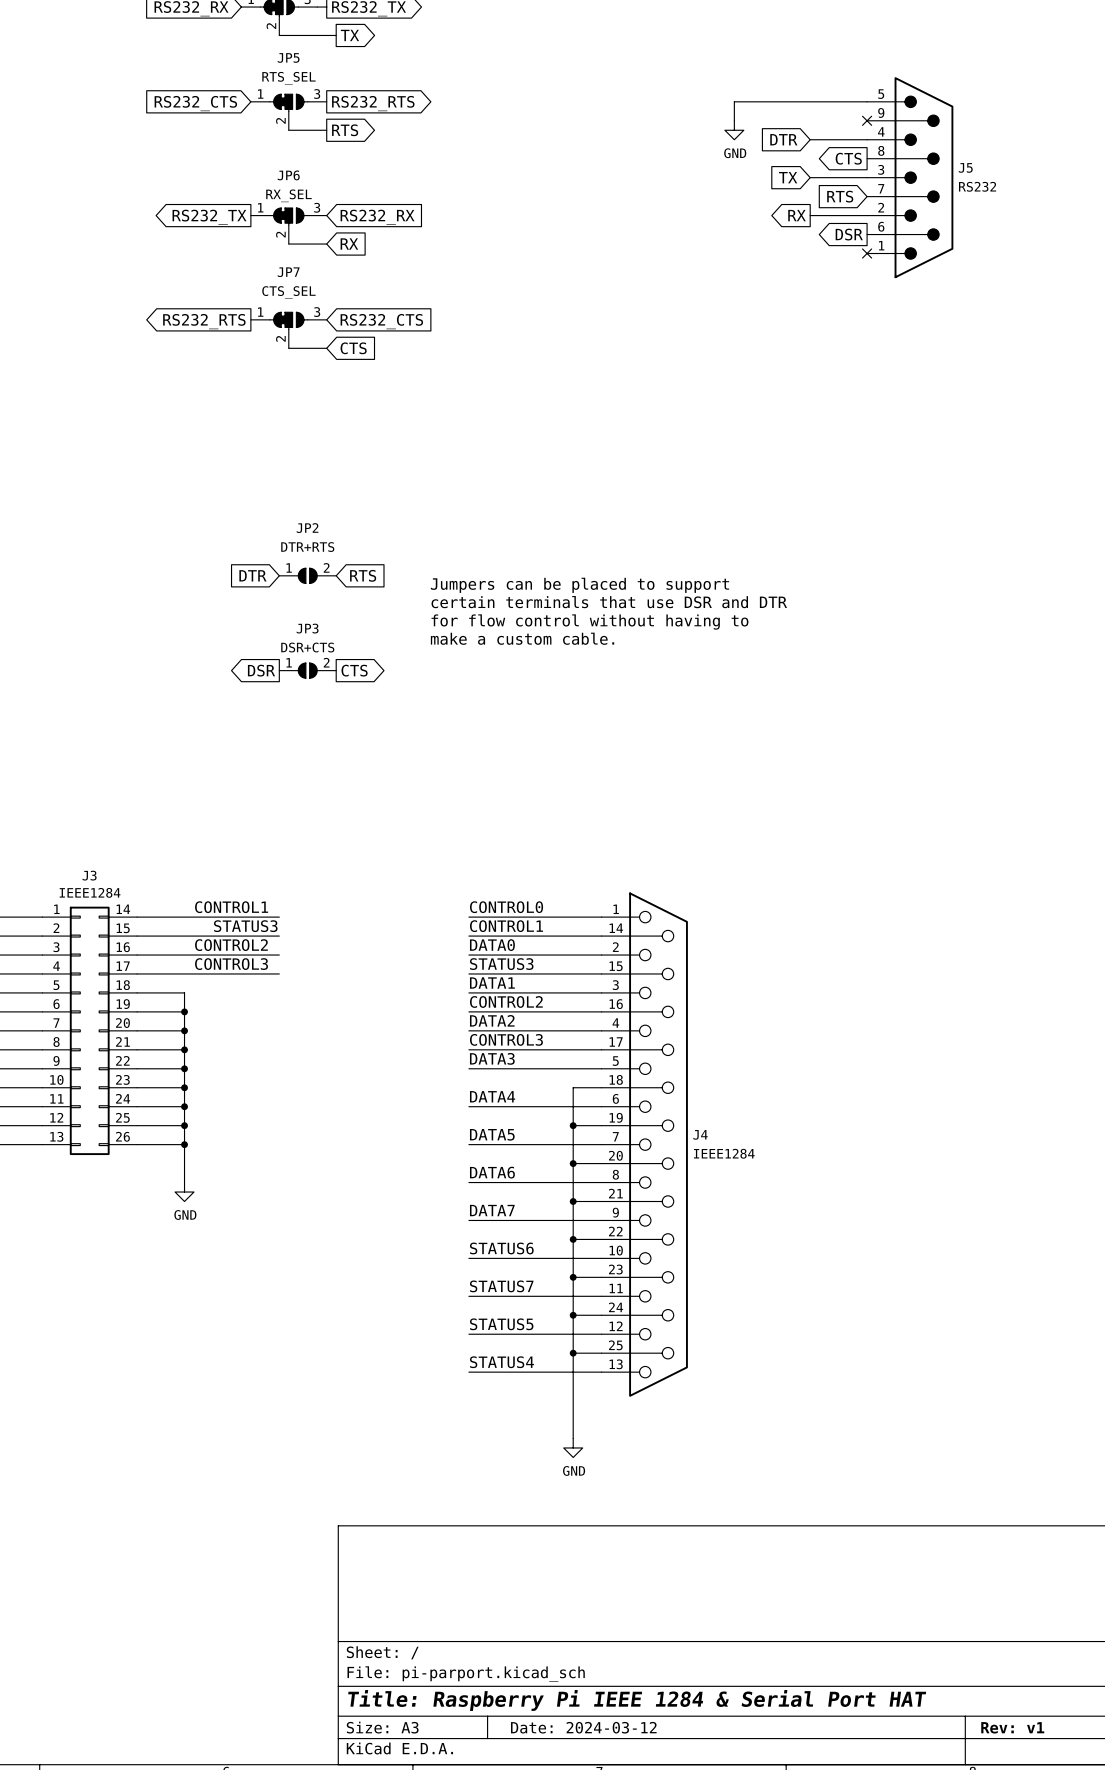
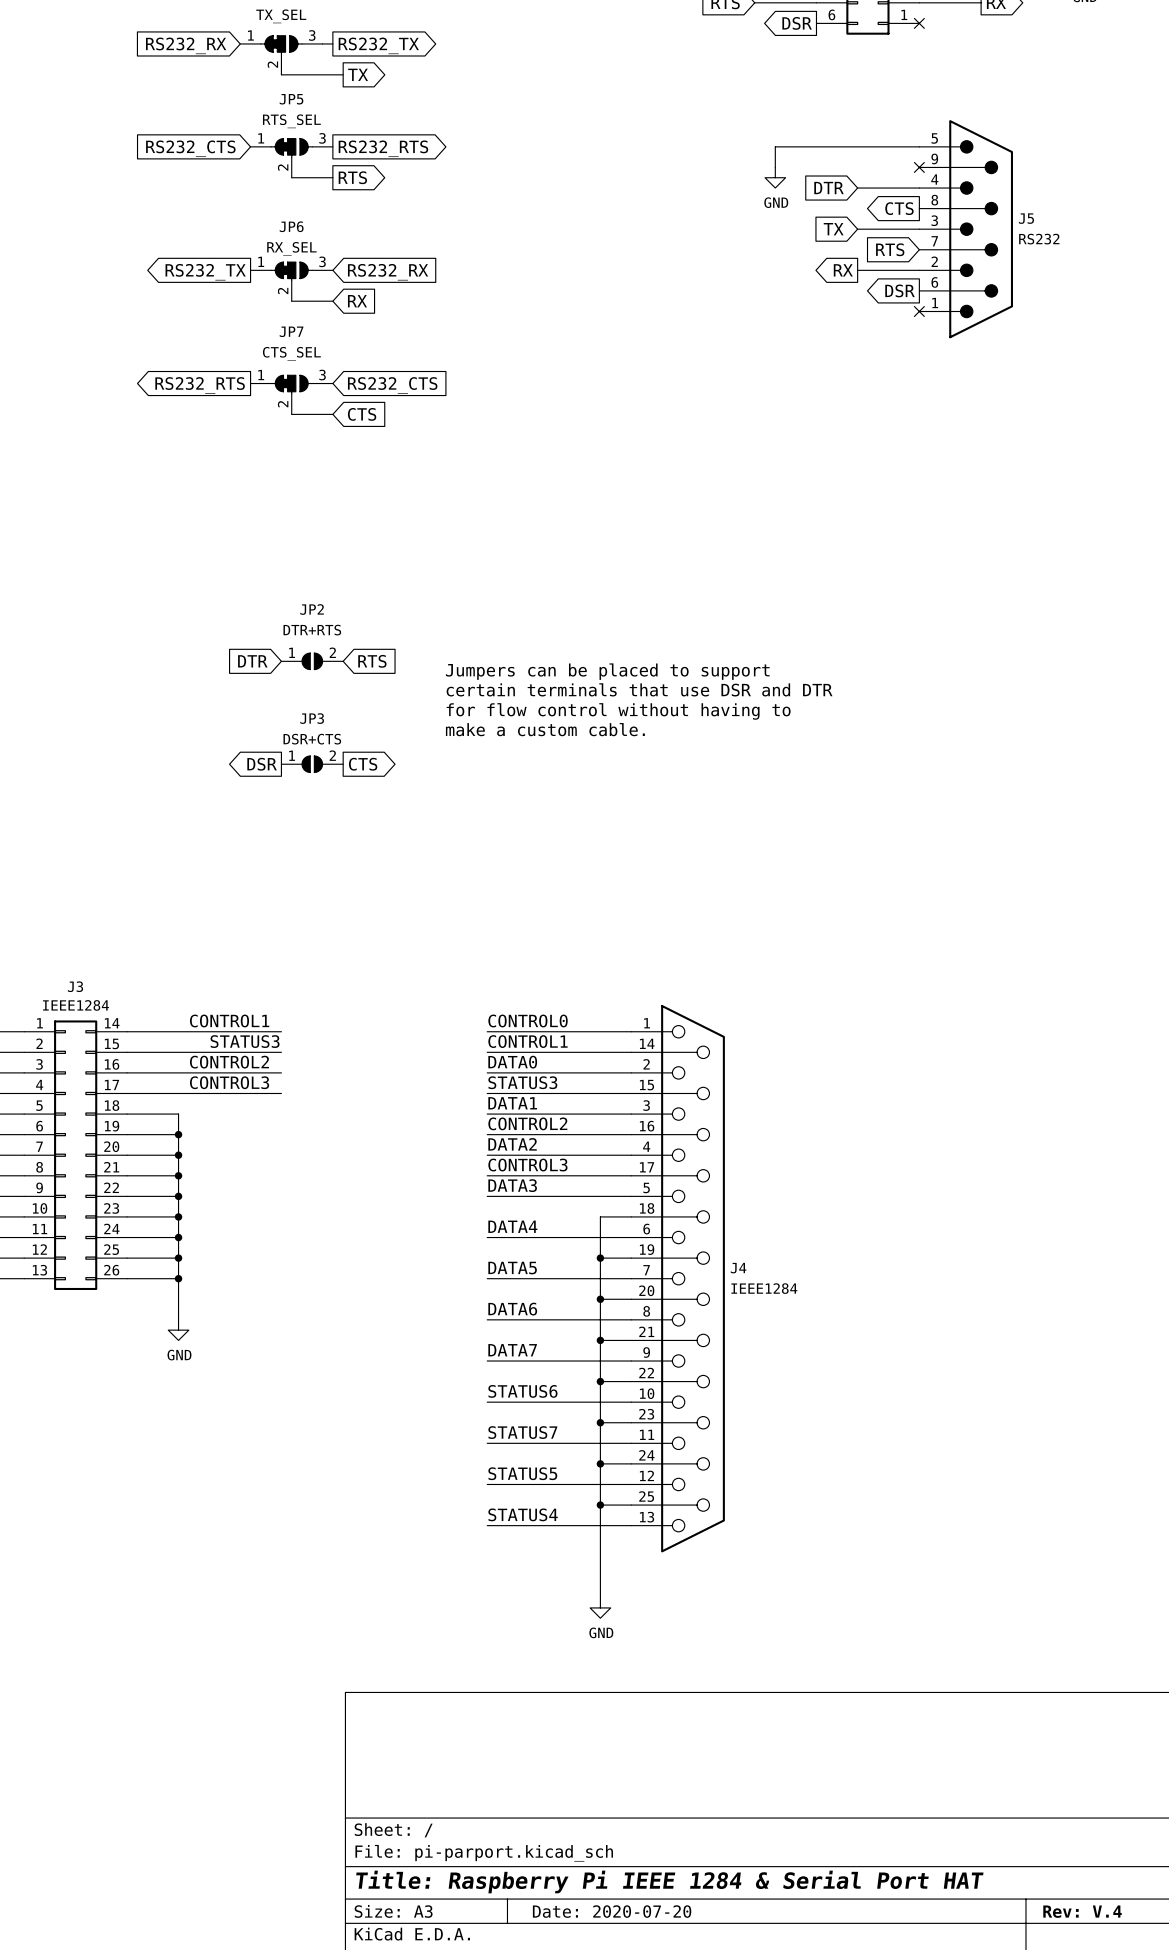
title block: Date: 2024-03-12 (583, 1727) -> Date: 2020-07-20 (612, 1911)
title block: Rev: v1 (1012, 1727) -> Rev: V.4 (1082, 1911)

